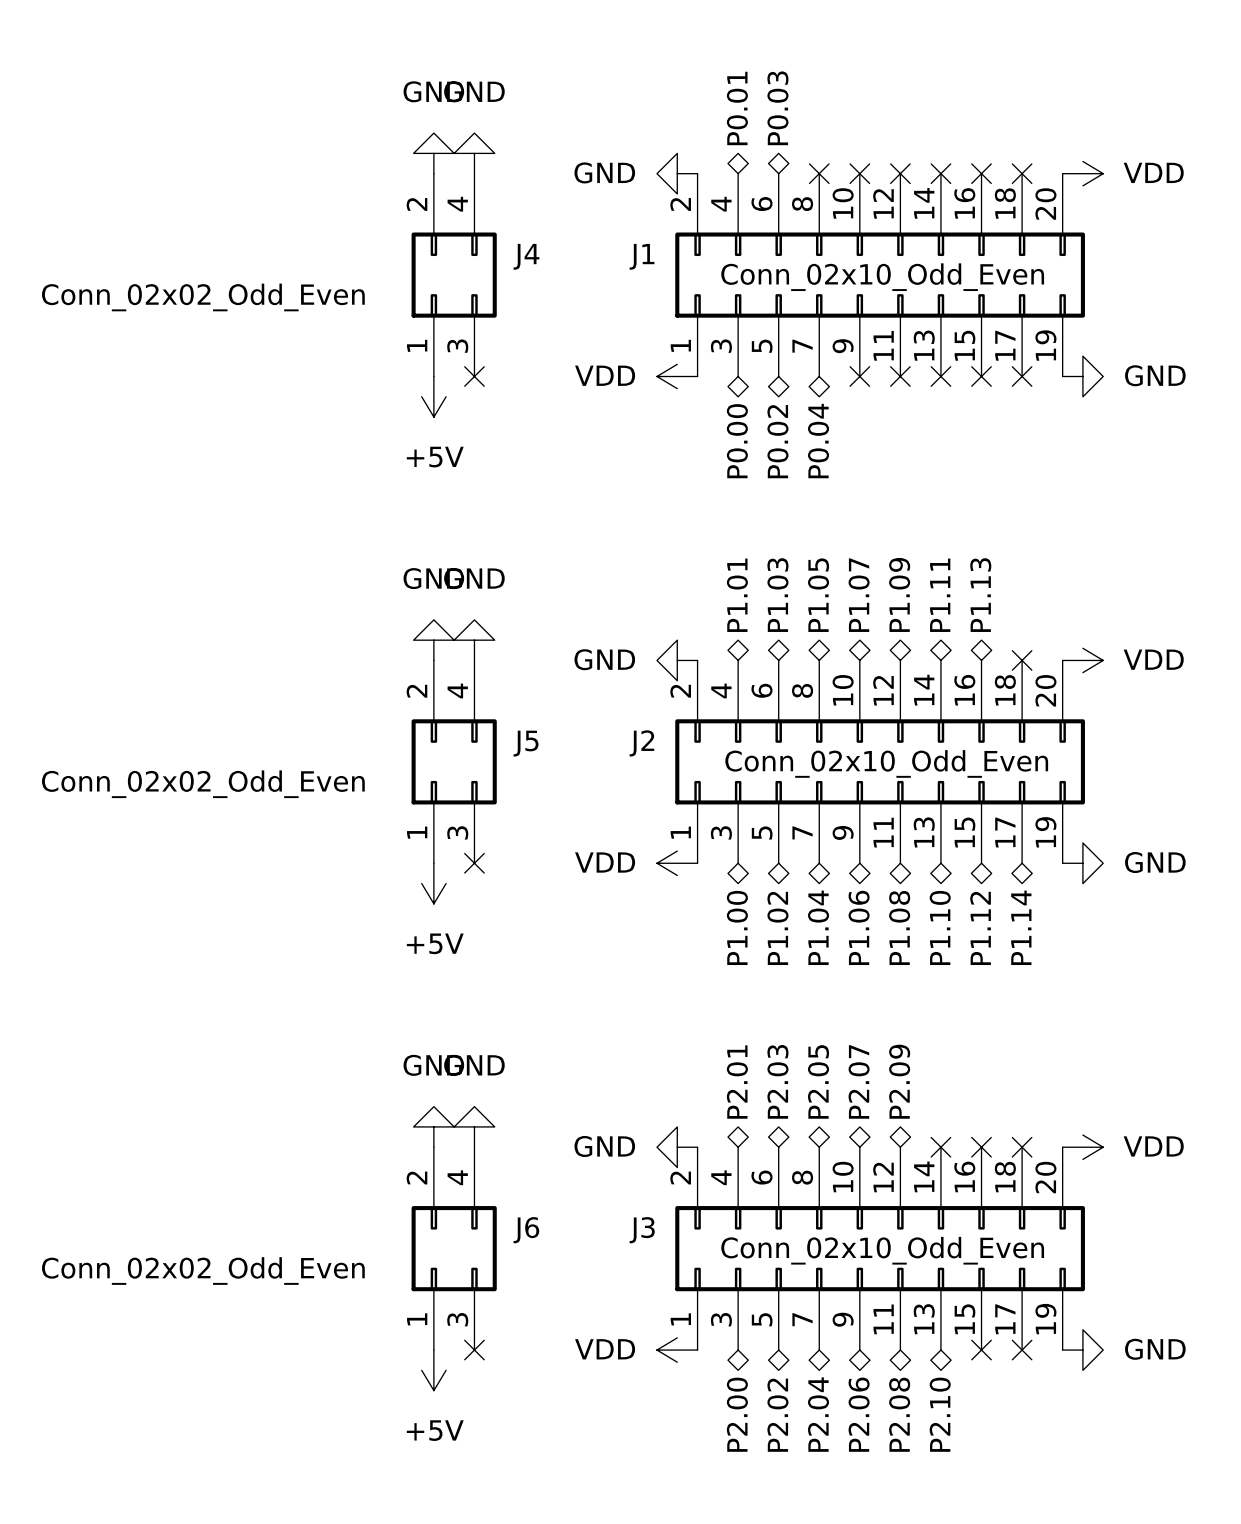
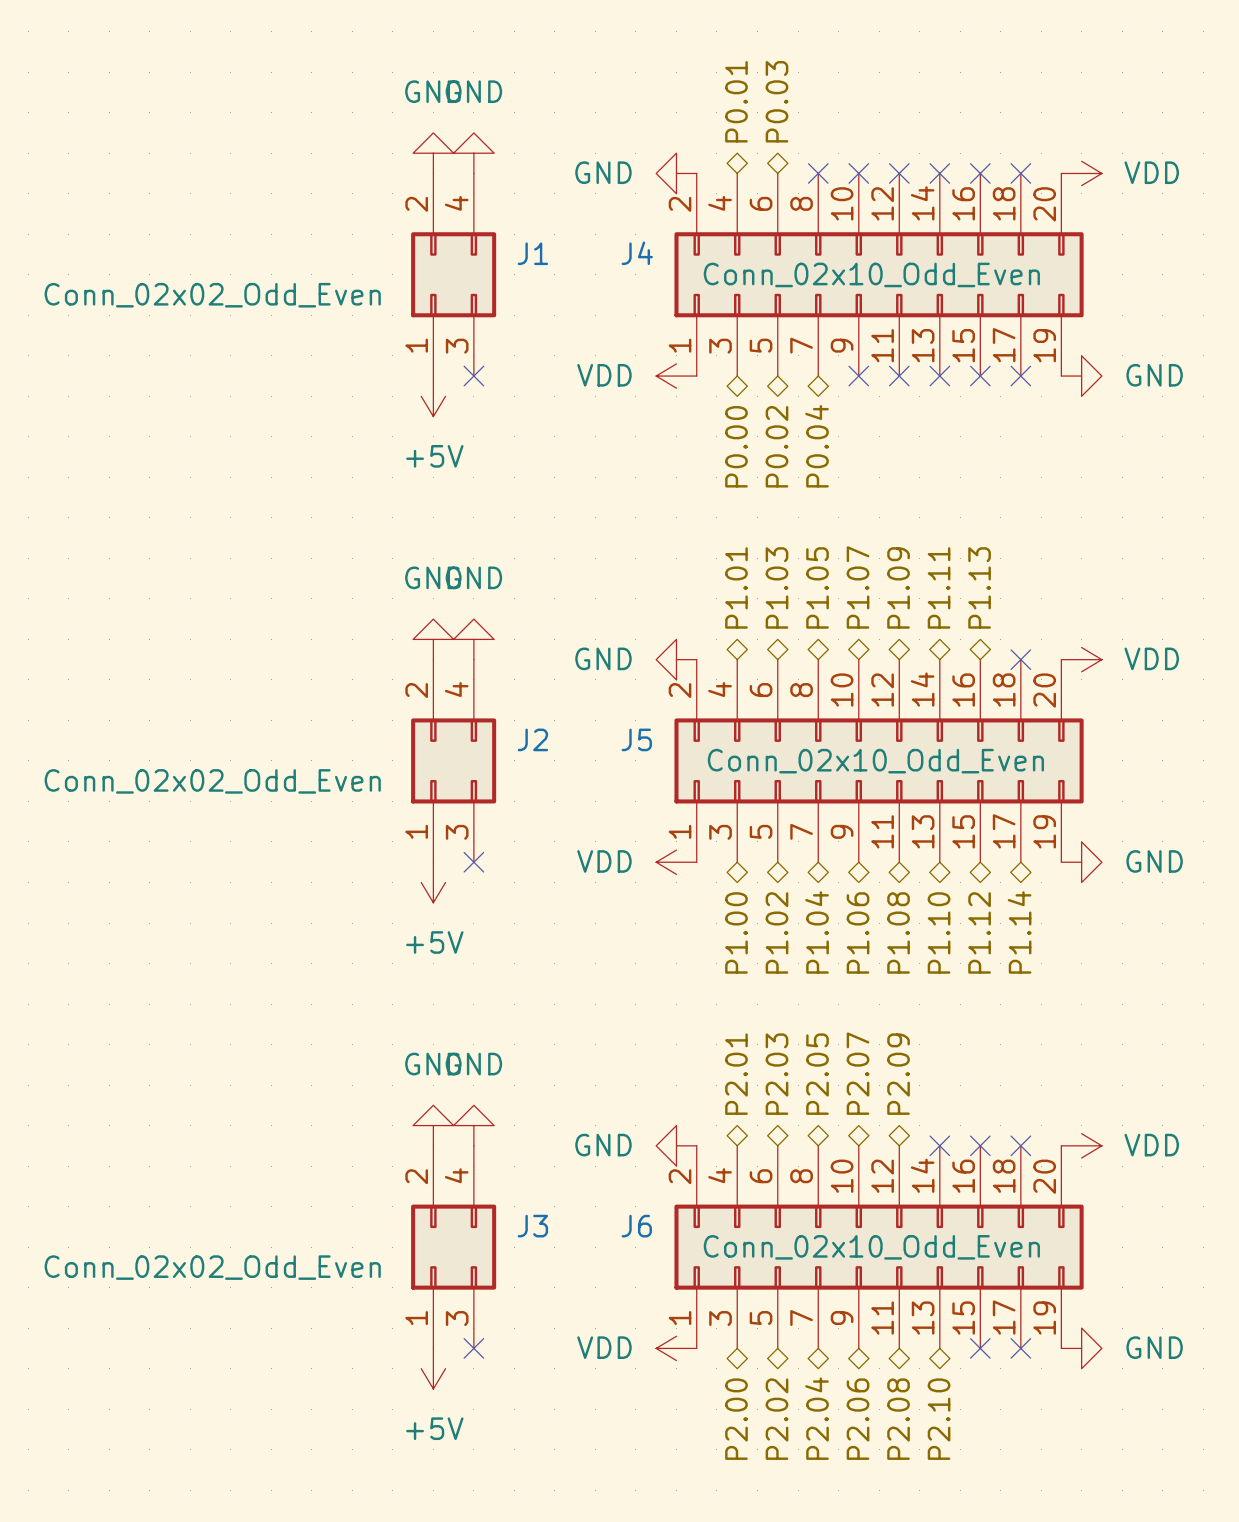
J4 name: J4 (526, 256) -> J1 (532, 253)
J1 name: J1 (642, 256) -> J4 (637, 253)
J5 name: J5 (526, 743) -> J2 (532, 739)
J2 name: J2 (641, 743) -> J5 (636, 739)
J6 name: J6 (526, 1230) -> J3 (532, 1226)
J3 name: J3 (642, 1230) -> J6 (636, 1226)

